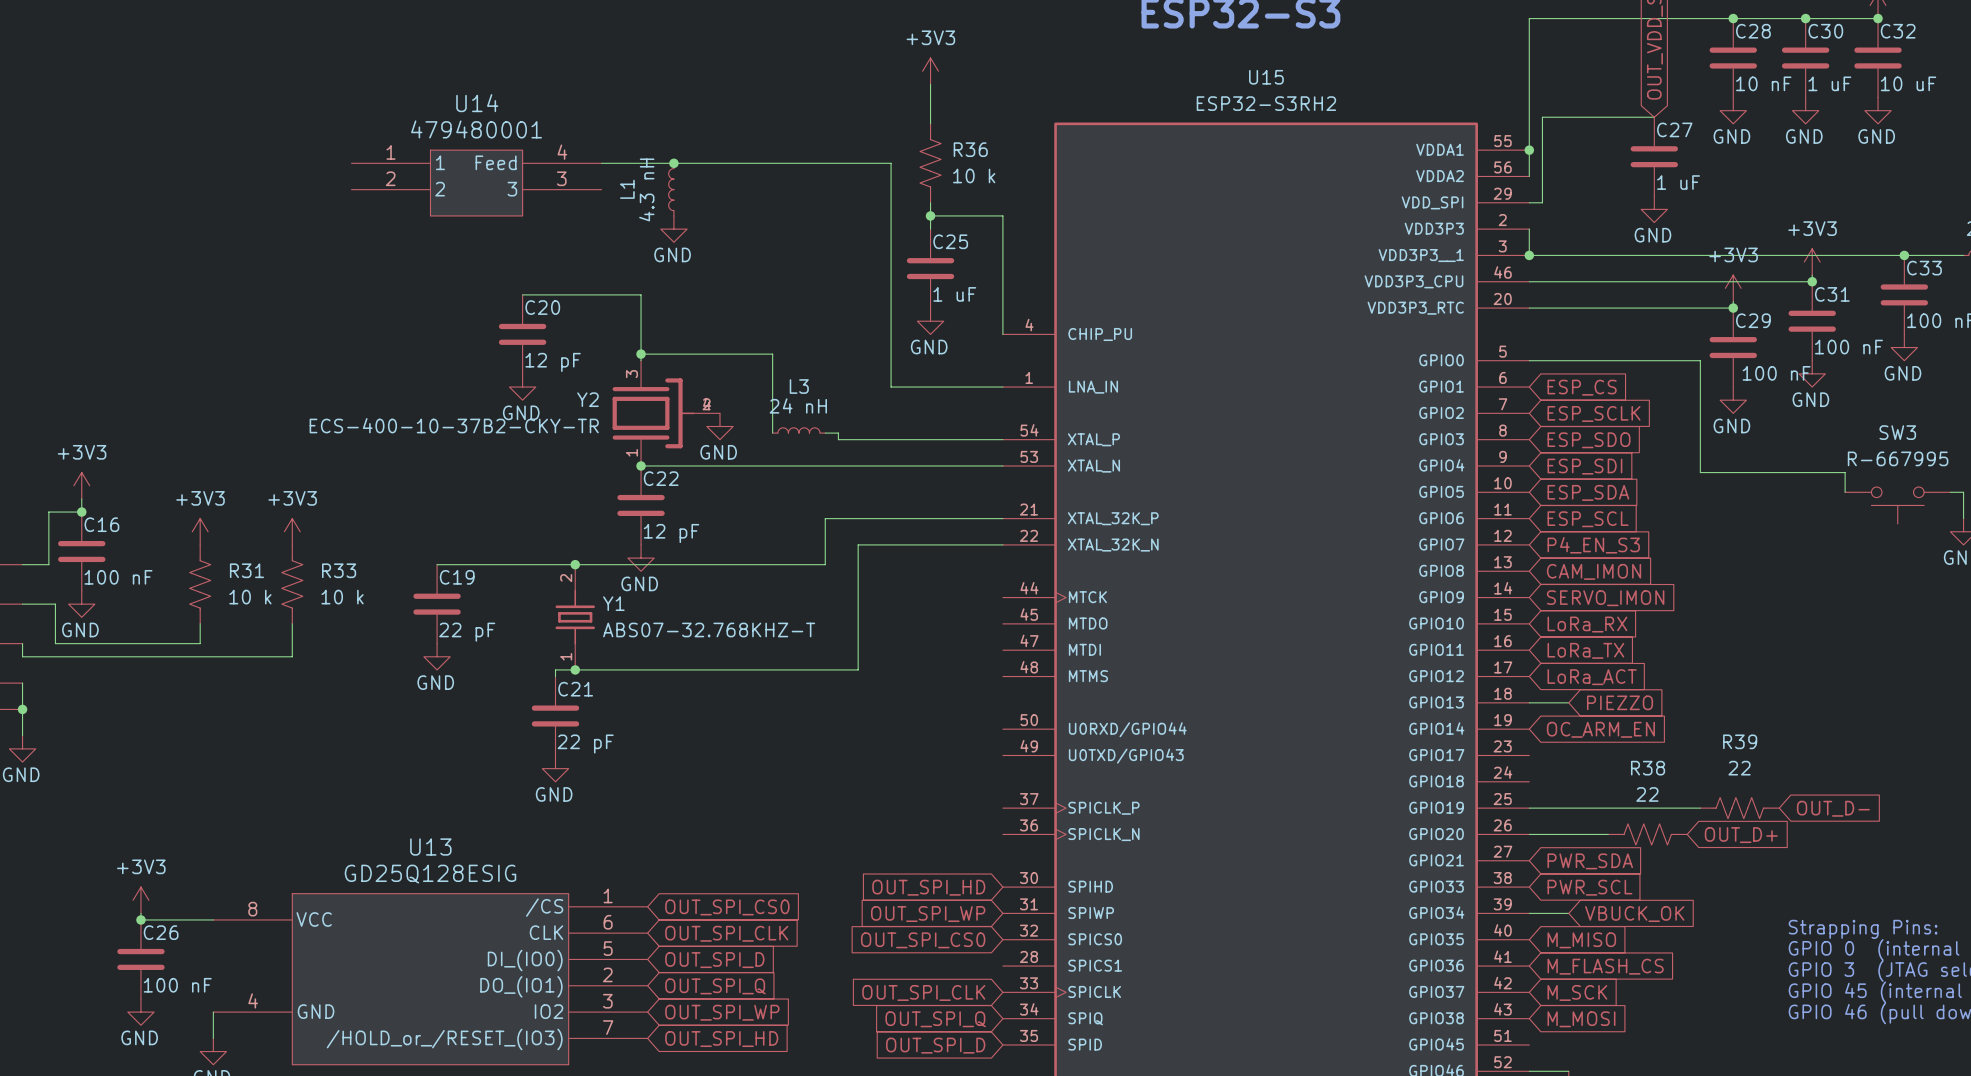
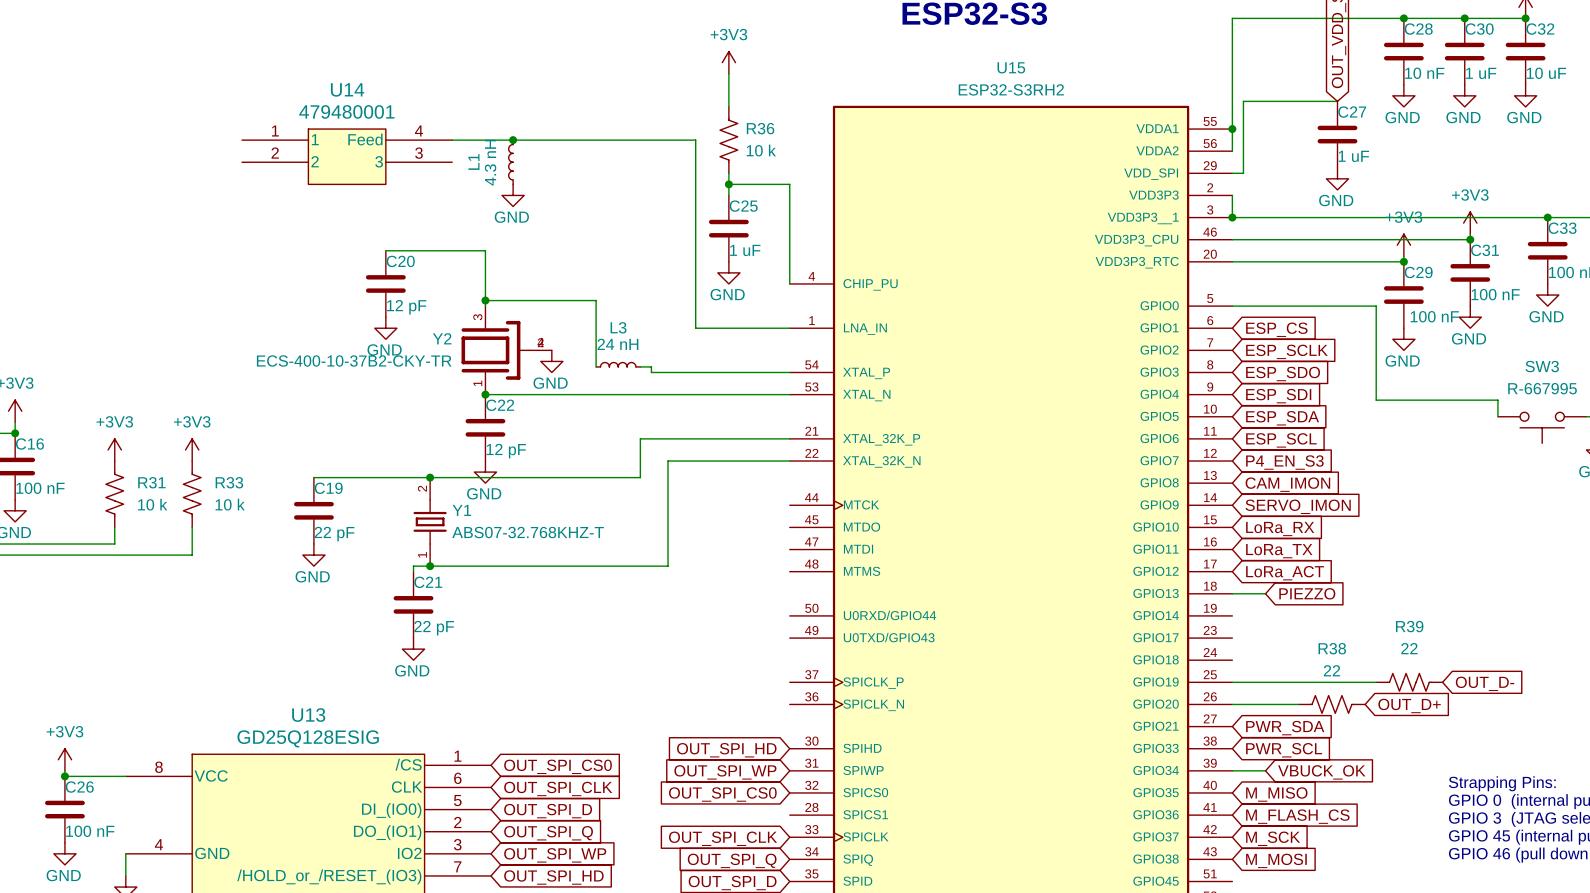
global label: OC_ARM_EN (1600, 729) -> none

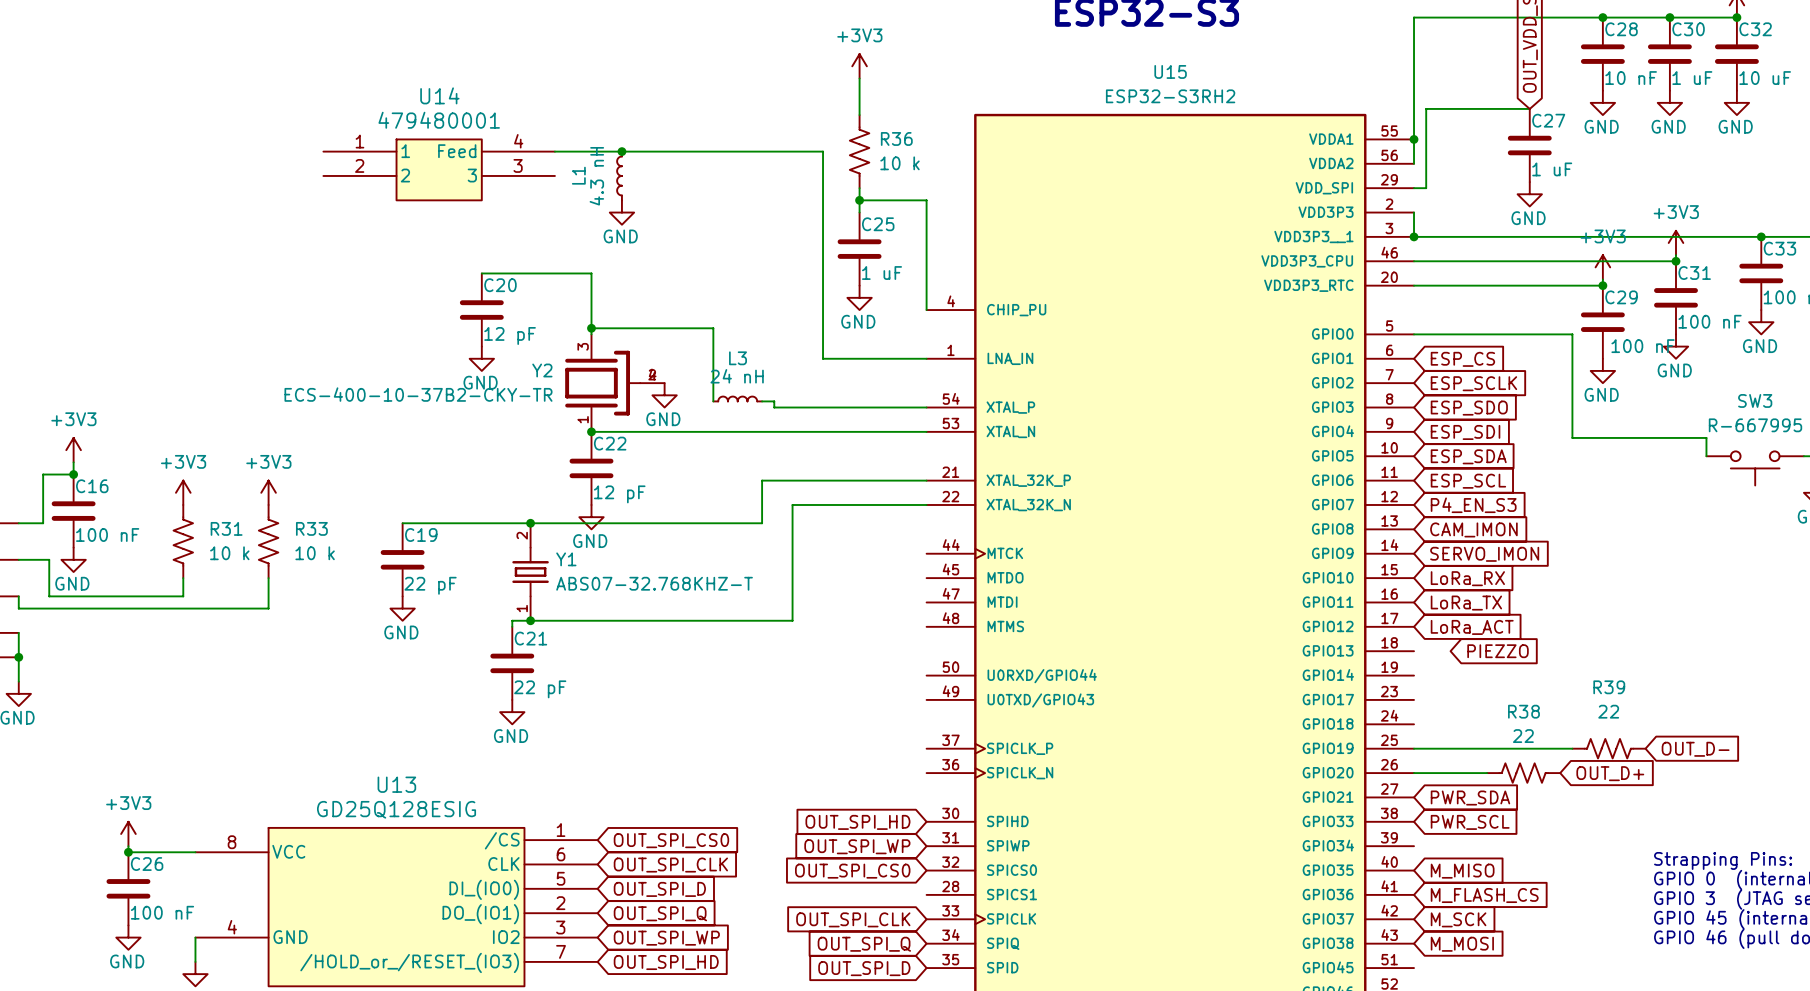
wire: (1232, 593) (1265, 593) -> none
wire: (1232, 770) (1265, 770) -> none
global label: VBUCK_OK (1321, 772) -> none

